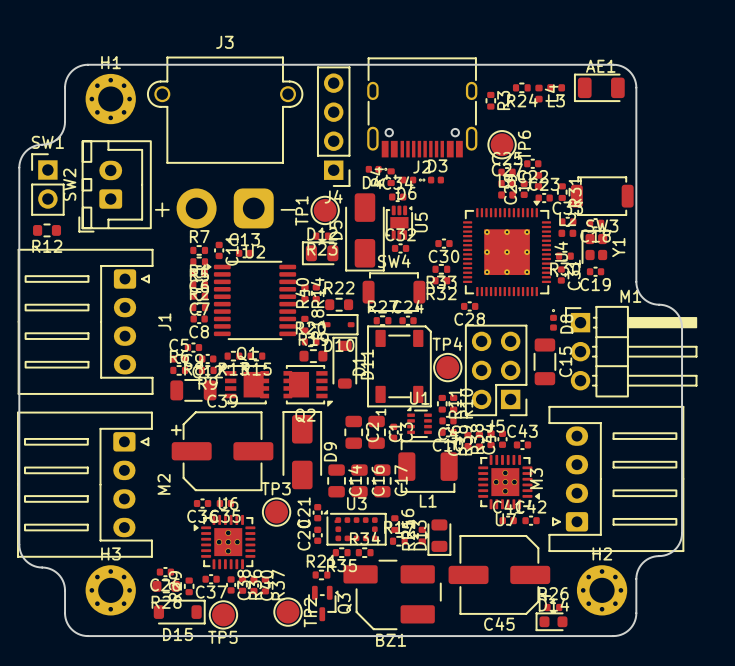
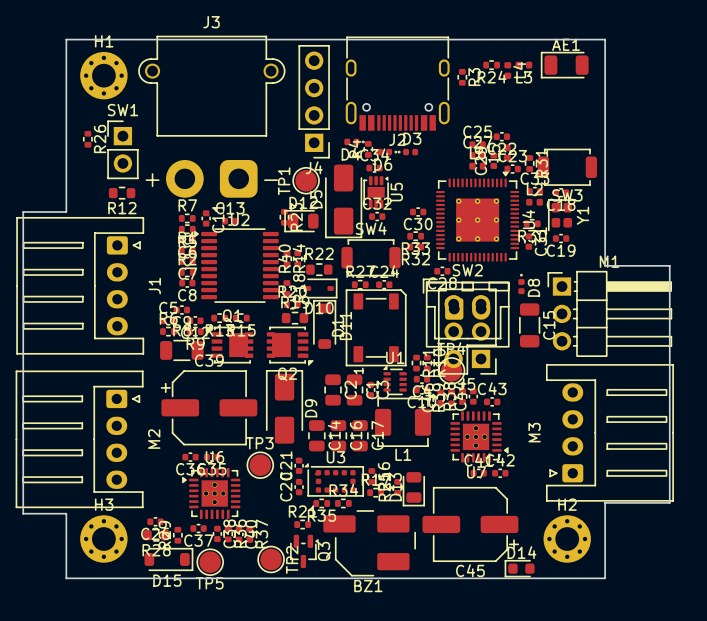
board edge: (87, 64) (613, 64) (623, 67) (629, 71) (635, 80) (636, 87) (636, 286) (639, 294) (647, 301) (666, 305) (675, 311) (679, 317) (682, 327) (681, 538) (677, 547) (671, 552) (649, 558) (639, 566) (636, 576) (636, 615) (629, 629) (621, 634) (613, 636) (87, 636) (77, 633) (71, 629) (65, 618) (64, 587) (61, 578) (52, 569) (34, 566) (27, 562) (22, 556) (19, 547) (19, 167) (21, 157) (27, 149) (34, 146) (52, 142) (61, 134) (64, 124) (66, 80) (73, 69) (87, 64) -> (66, 39) (66, 211) (23, 211) (23, 513) (66, 513) (66, 578) (605, 578) (605, 502) (669, 502) (669, 265) (605, 265) (605, 39) (66, 39)
TP6: (502, 144) -> none
SW1 position: (47, 184) -> (122, 149)
SW2 rotation: 0° (115, 186) -> 90° clockwise (466, 313)
SW2 position: (115, 186) -> (466, 313)
R12 position: (47, 230) -> (122, 193)
R23 rotation: 0° (322, 236) -> 90° clockwise (284, 217)
R23 position: (322, 236) -> (284, 217)
M1 position: (631, 351) -> (609, 313)
C15 position: (544, 361) -> (529, 325)
TP4 position: (447, 367) -> (451, 370)
M3 position: (616, 478) -> (609, 432)
R26 rotation: 0° (553, 607) -> 90° clockwise (87, 139)
R26 position: (553, 607) -> (87, 139)

